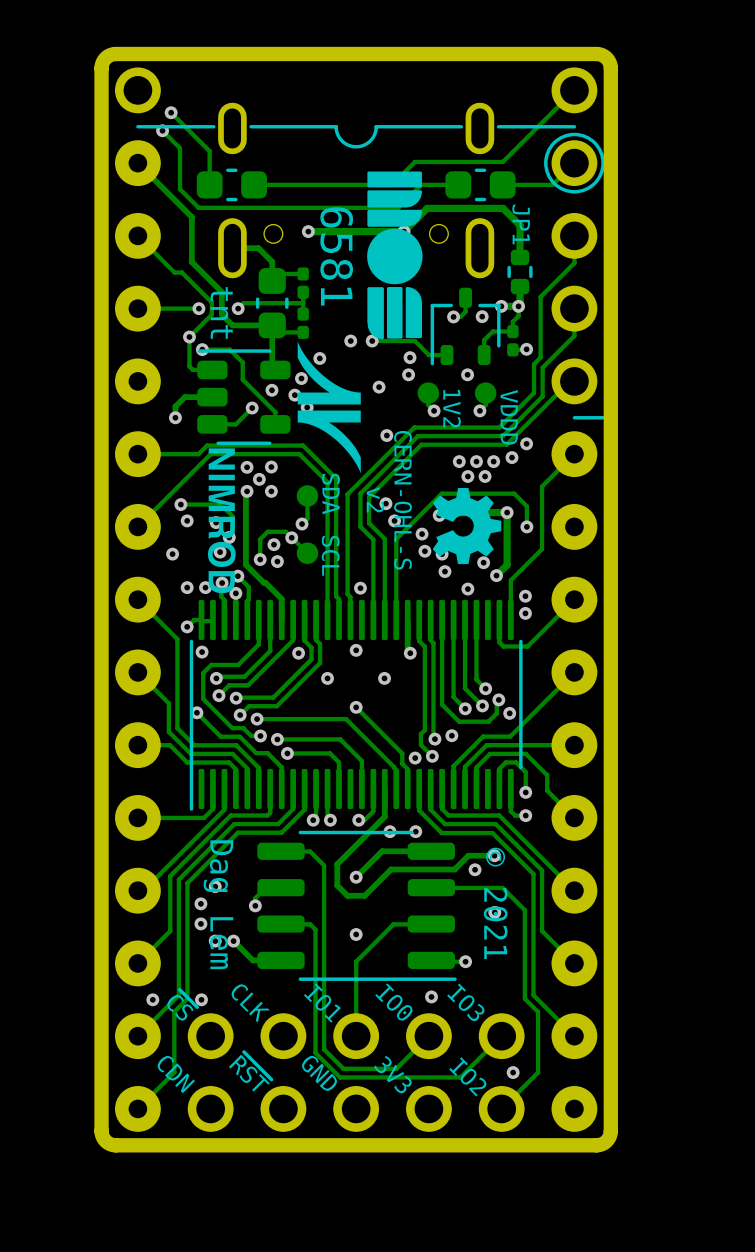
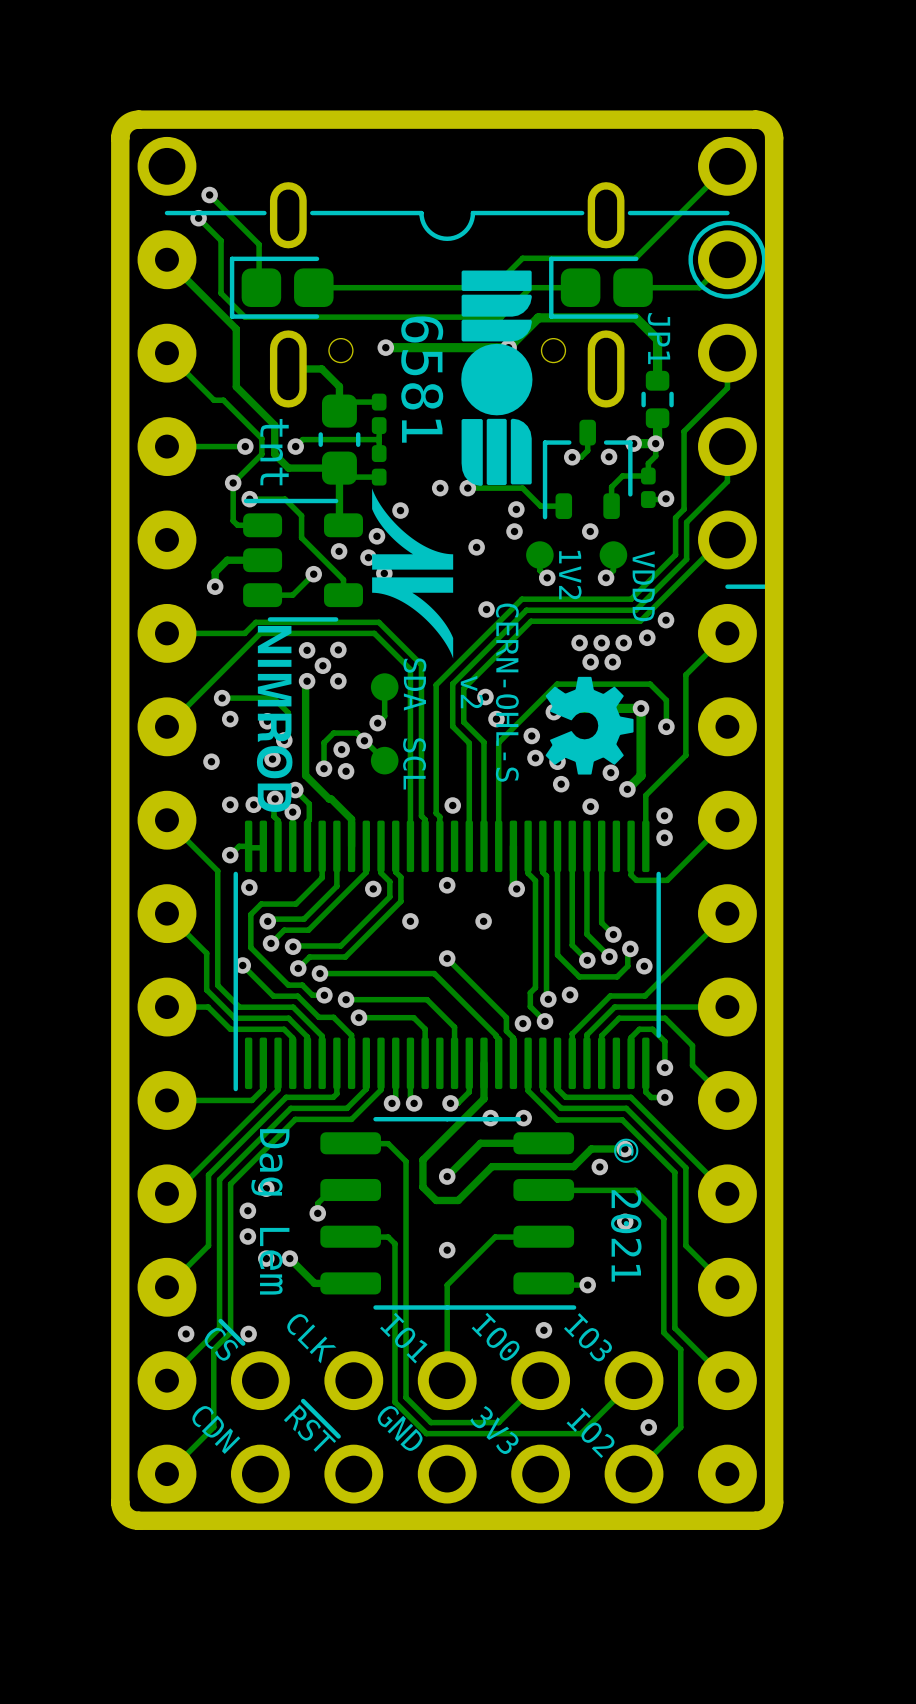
part footprint: [196, 168, 267, 202] -> [229, 256, 334, 319]
part footprint: [445, 168, 516, 202] -> [549, 256, 653, 319]

